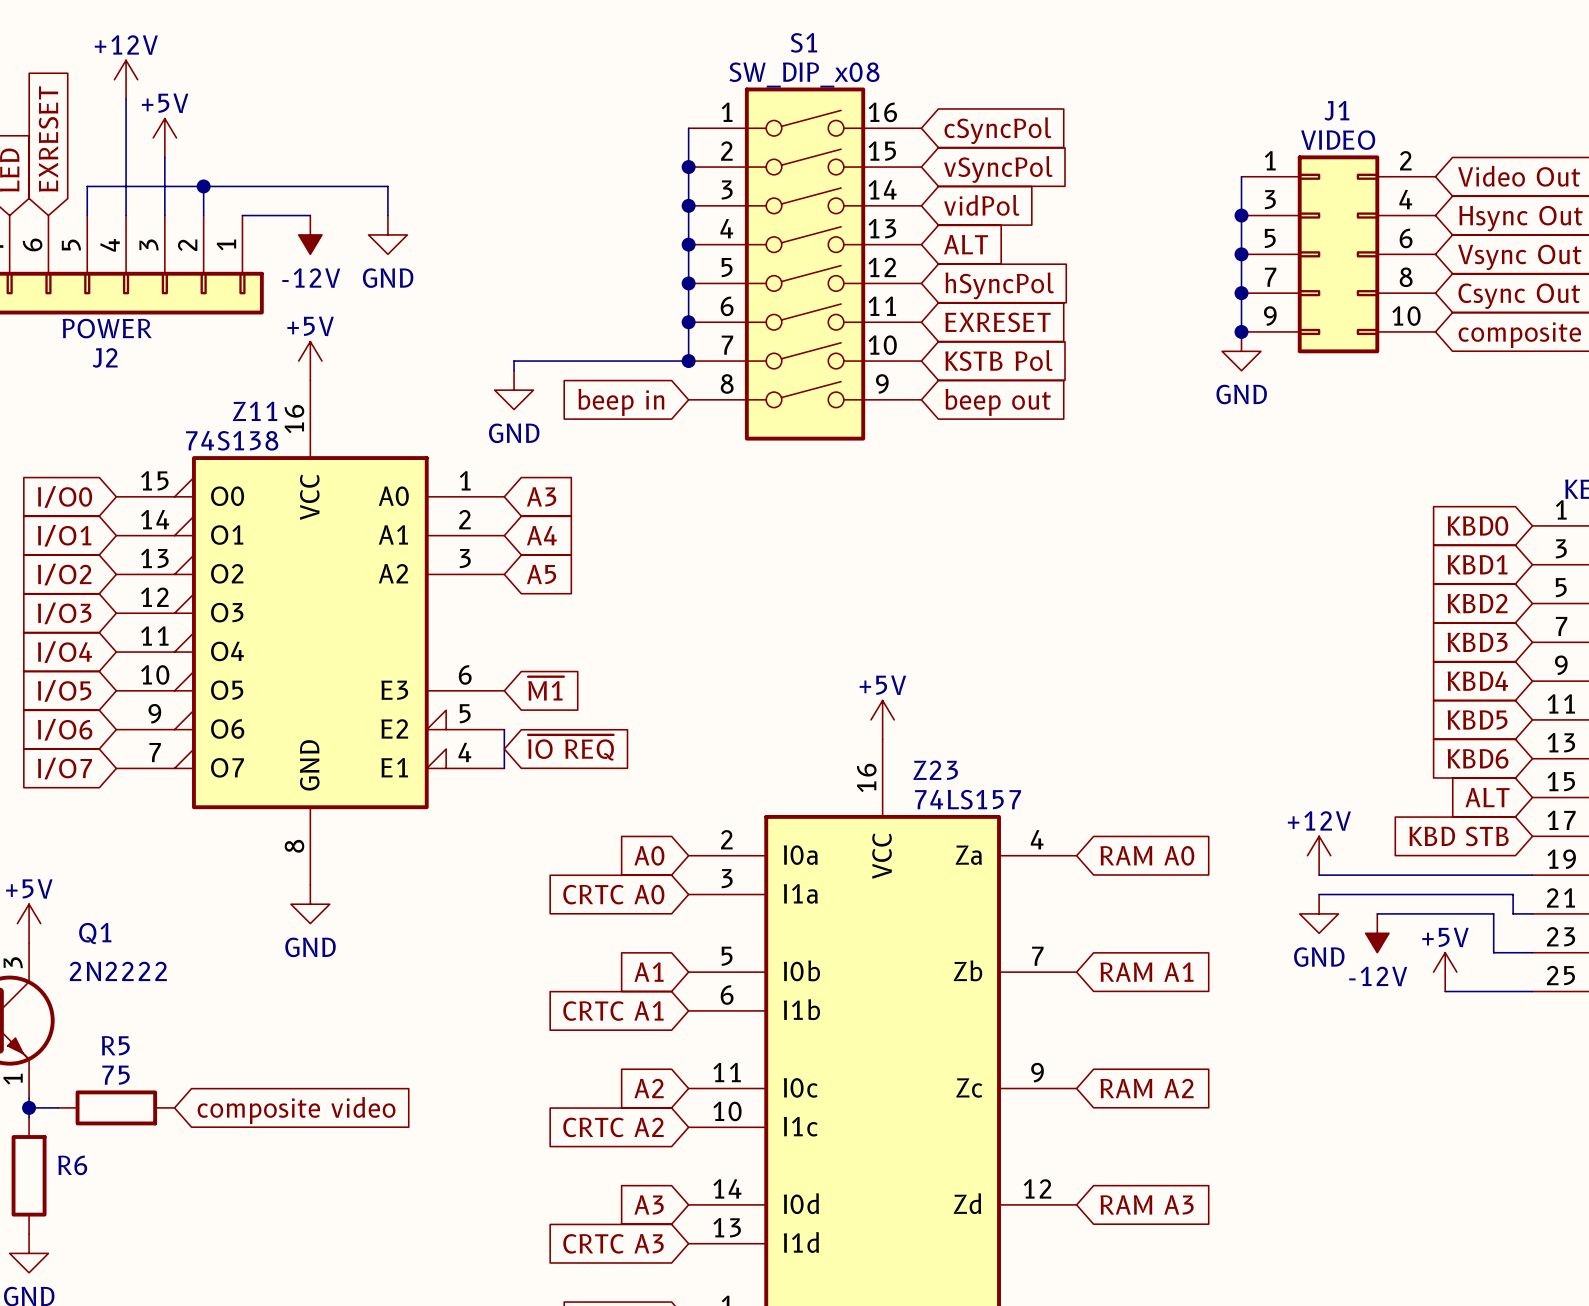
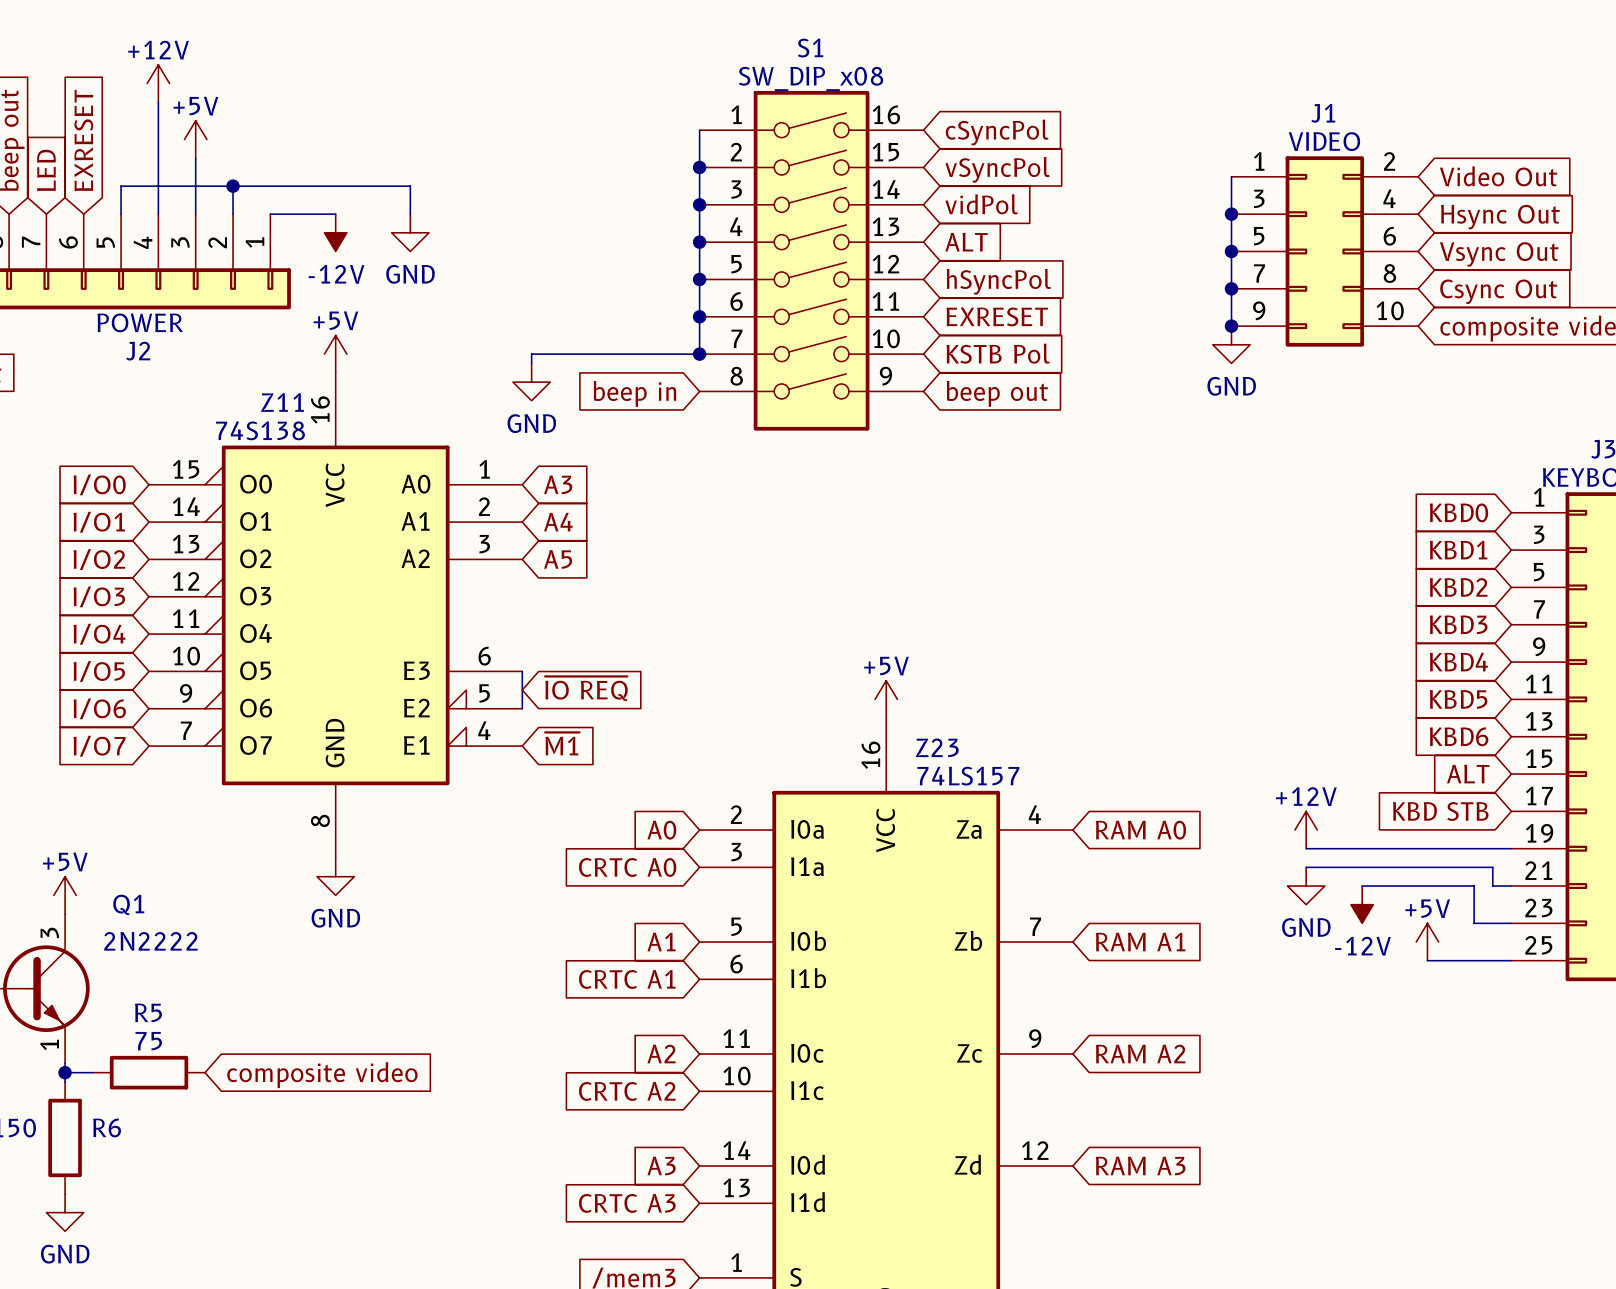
global label position: ~{M1} (545, 688) -> ~{M1} (562, 743)
wire: (504, 729) (504, 768) -> (522, 708) (522, 671)
global label position: ~{IO REQ} (571, 747) -> ~{IO REQ} (586, 688)

